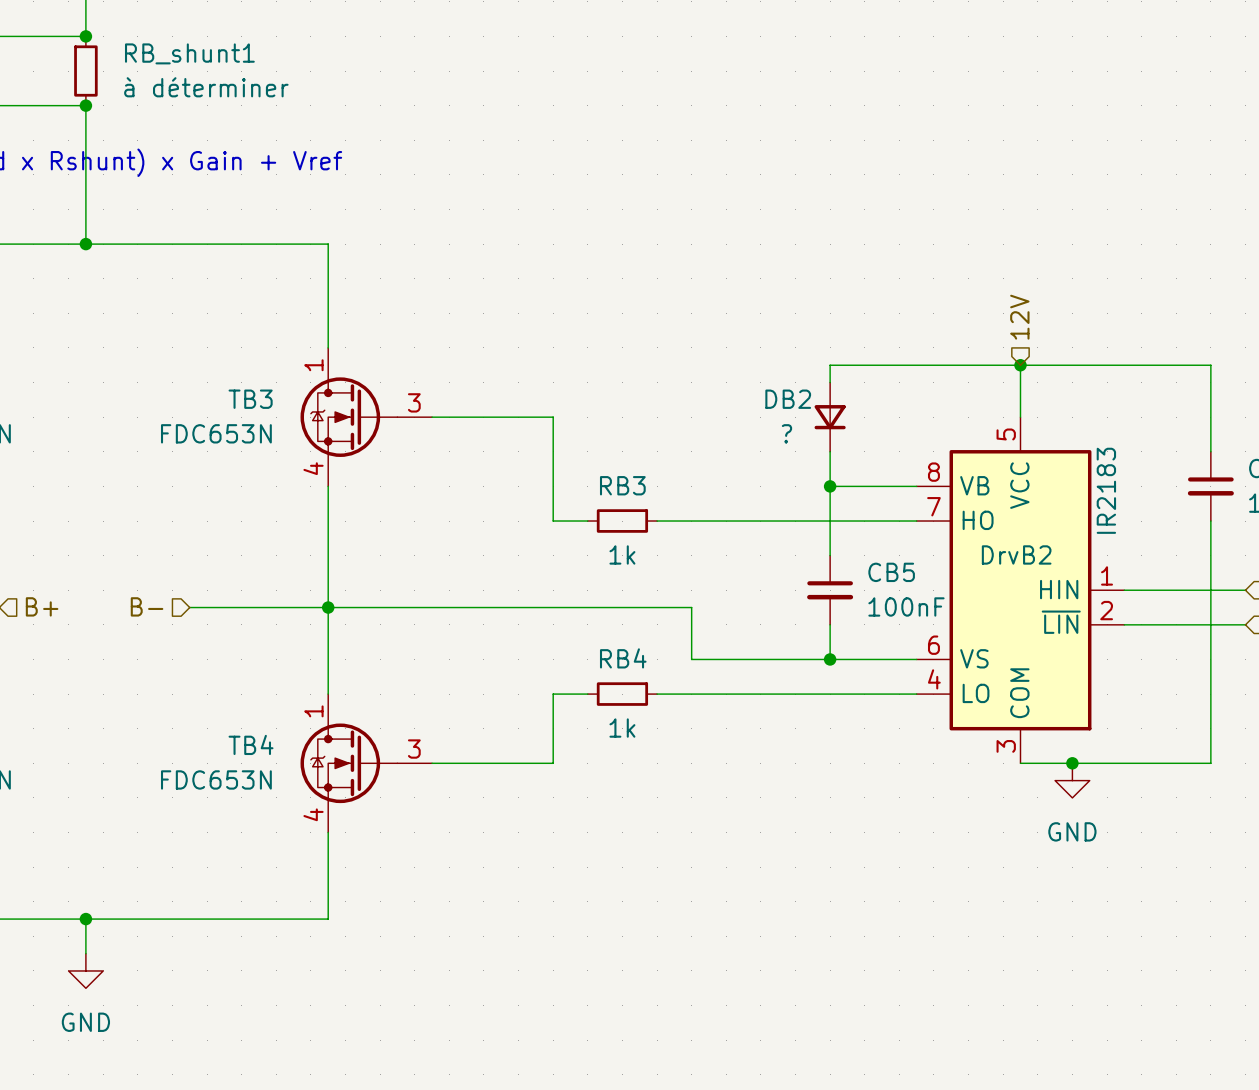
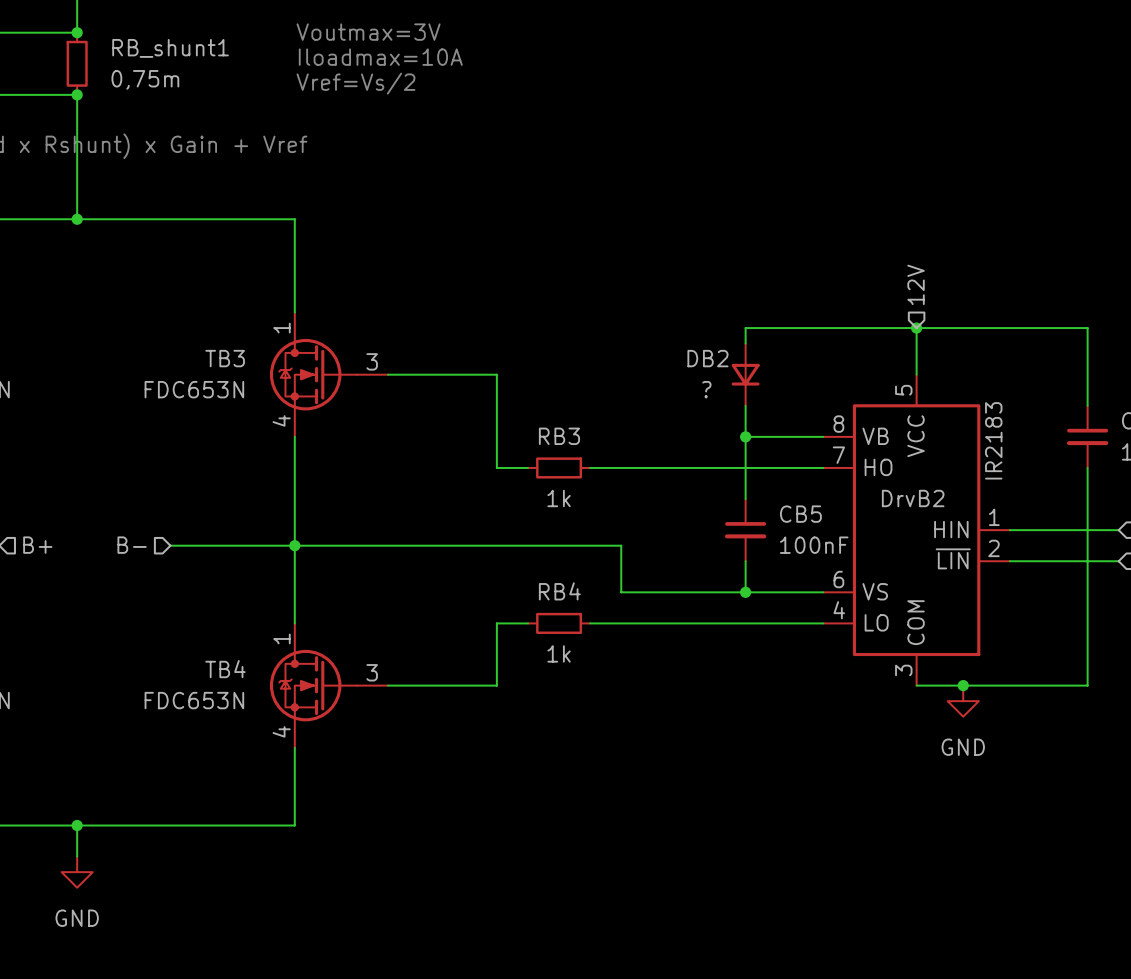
text: none -> Voutmax=3V (368, 32)
text: none -> Iloadmax=10A (380, 57)
RB_shunt1 value: à déterminer (206, 87) -> 0,75m (145, 79)
text: none -> Vref=Vs/2 (355, 83)

